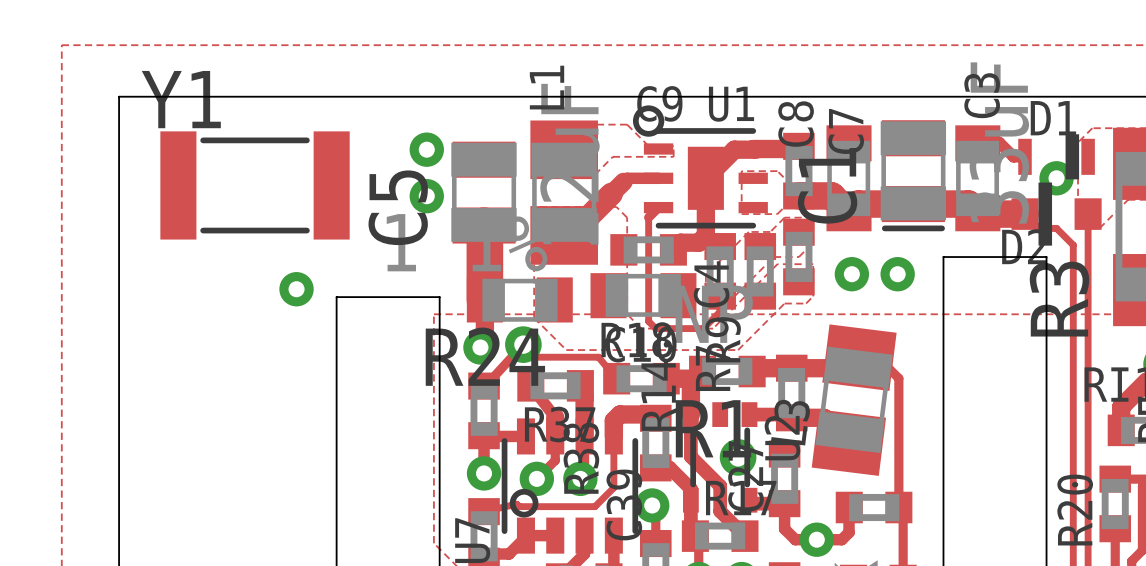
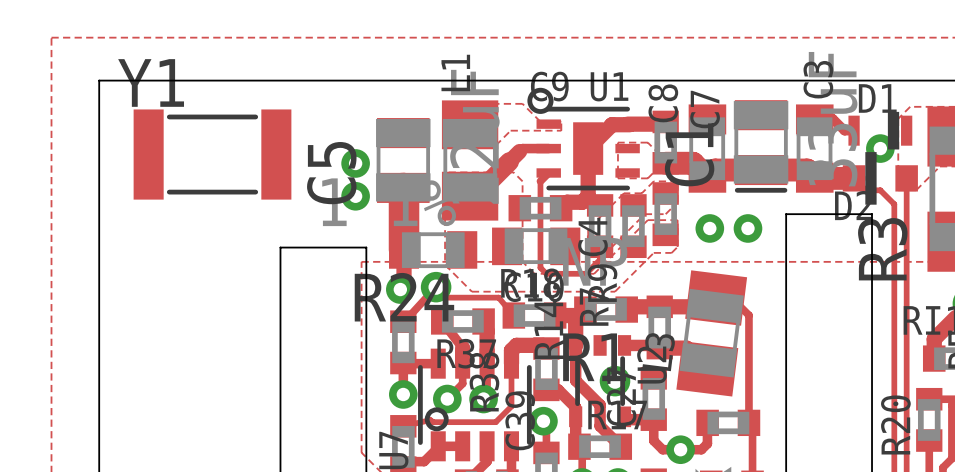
via: (426, 149) -> none
via: none -> (355, 196)
via: (296, 289) -> none

